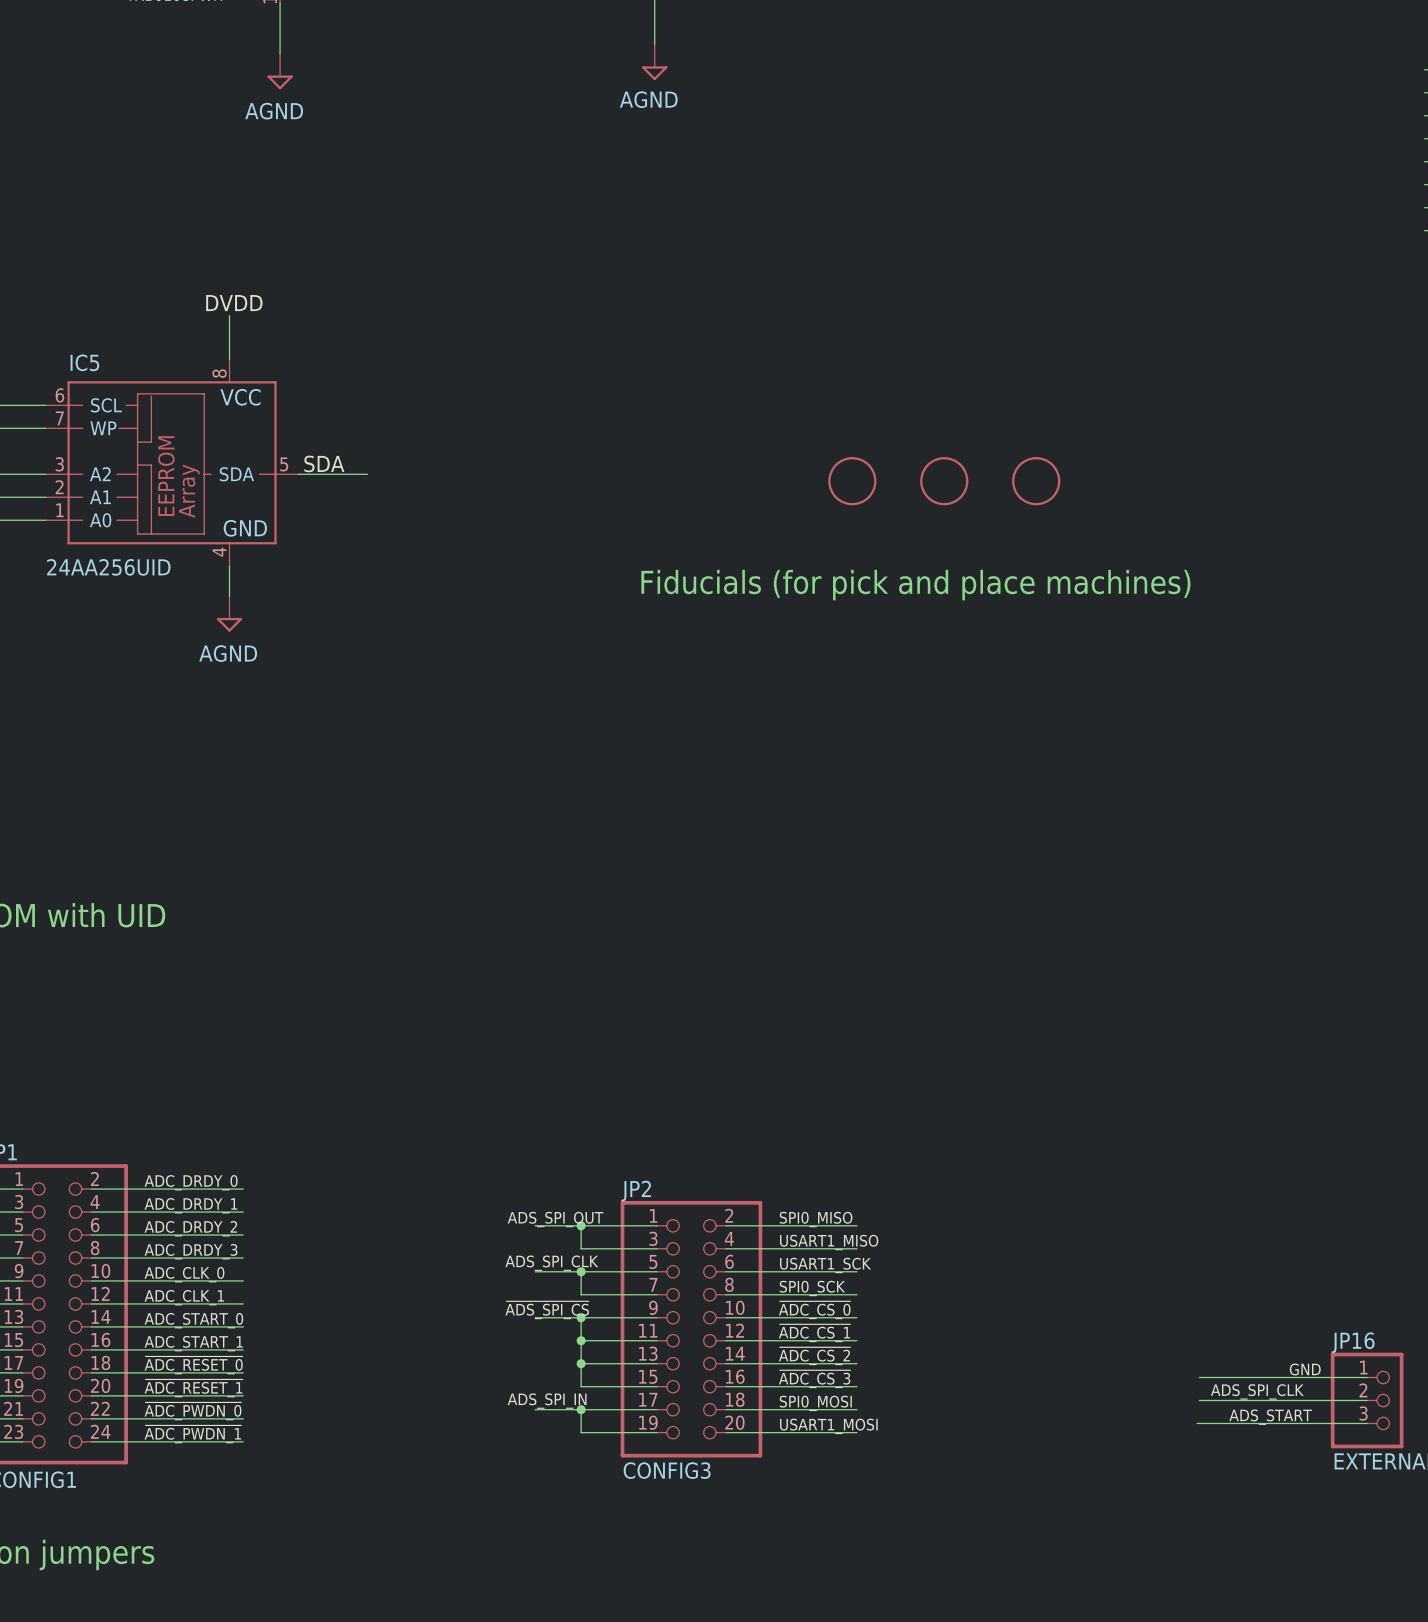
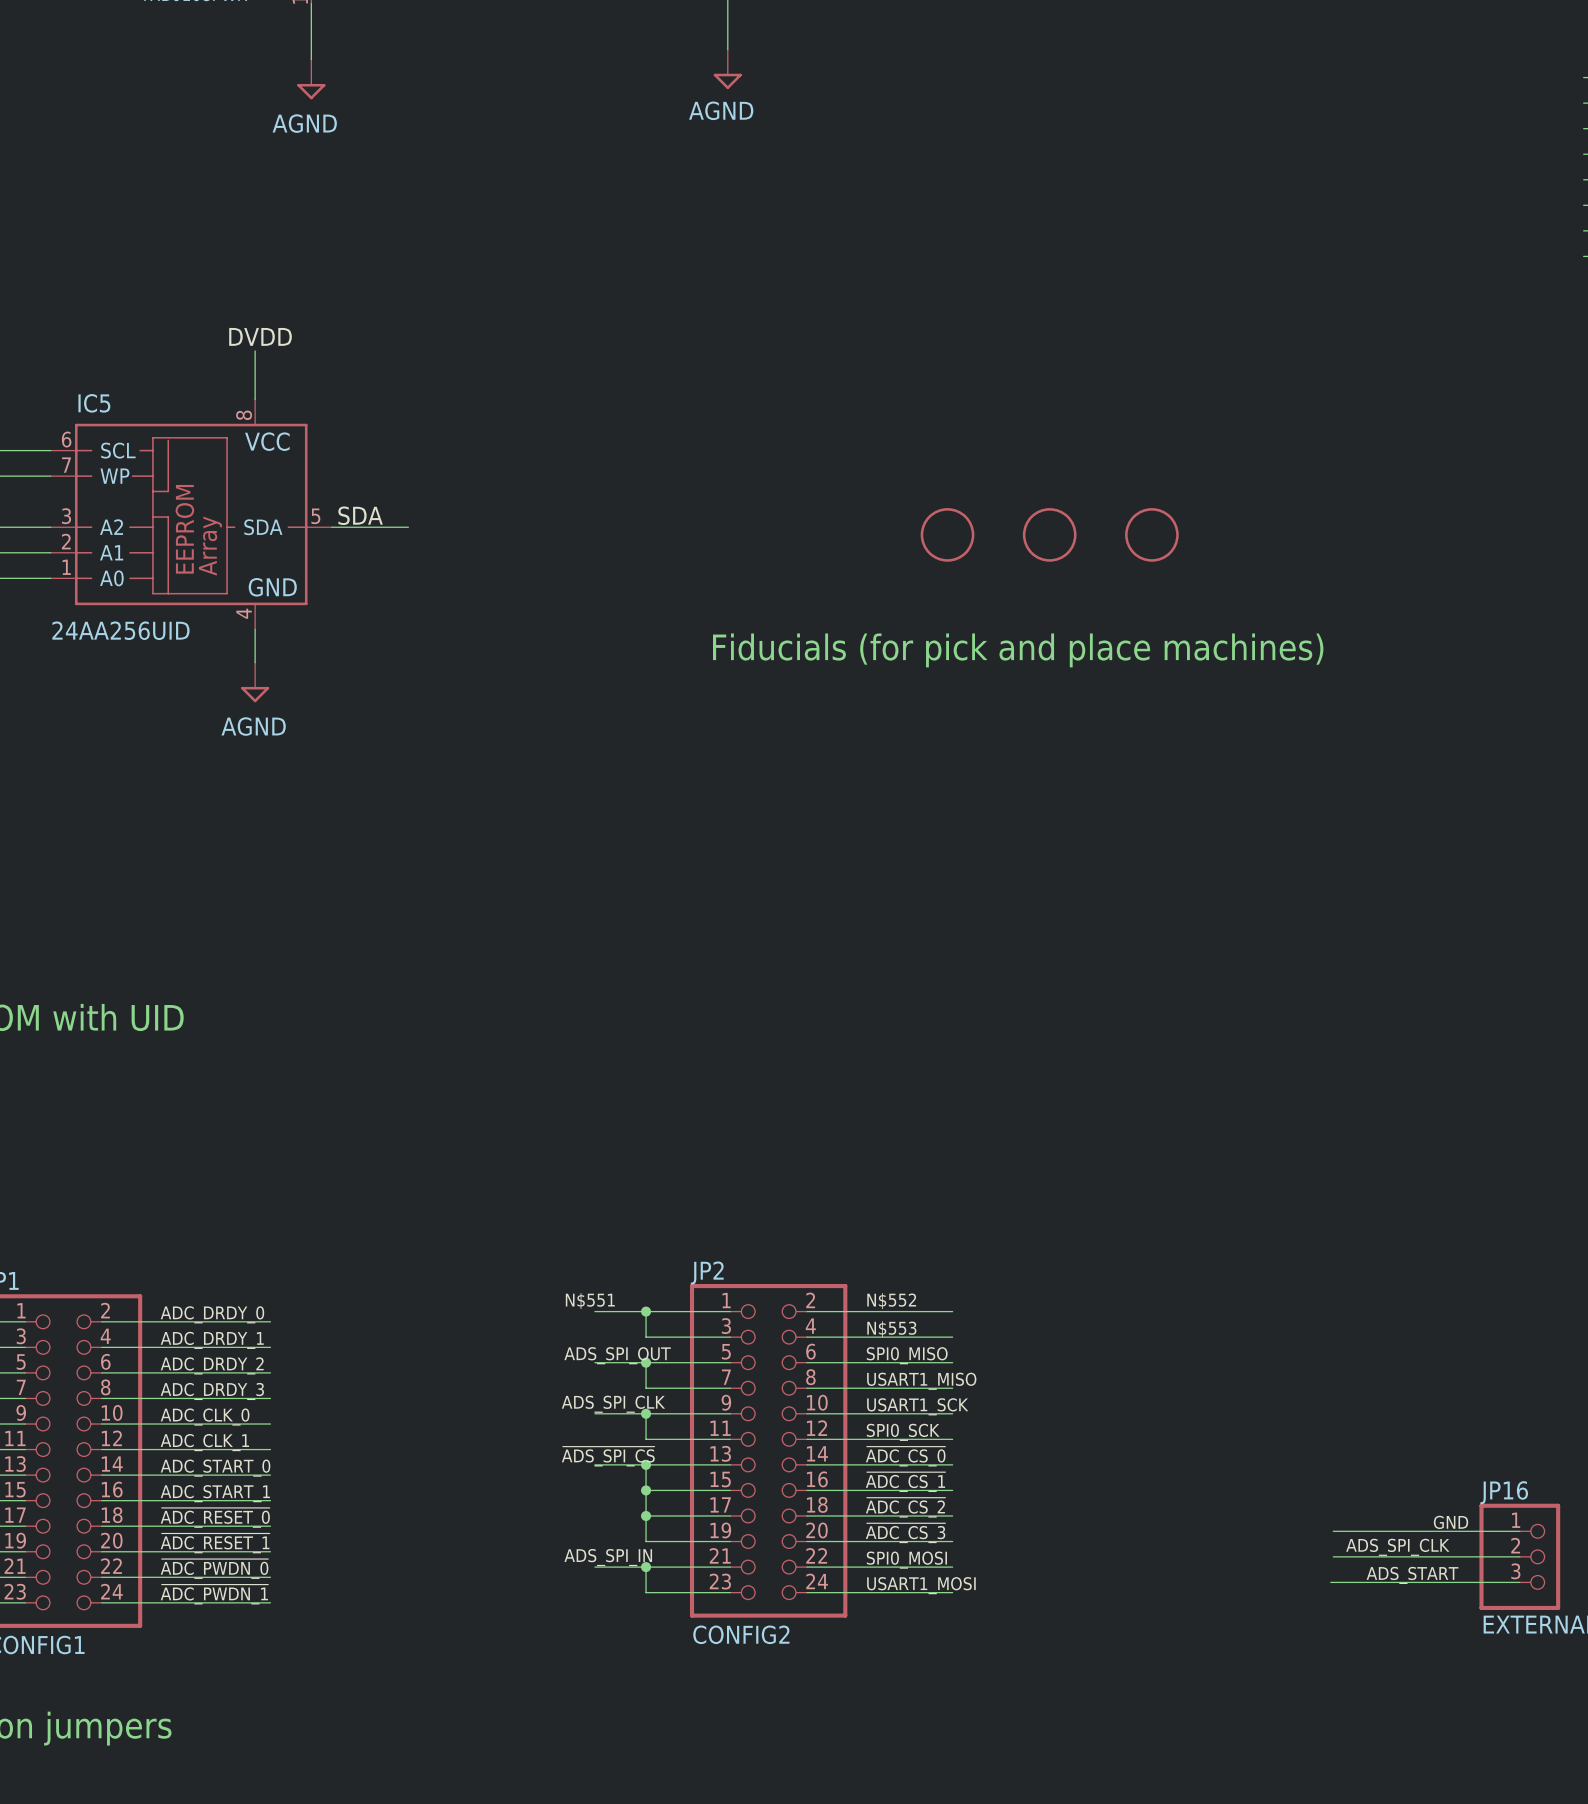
label: none -> N$551 (590, 1301)
label: none -> N$552 (891, 1301)
wire: none -> (594, 1311) (730, 1311)
wire: none -> (646, 1311) (646, 1337) (730, 1337)
junction: none -> (646, 1311)
wire: none -> (806, 1311) (952, 1311)
JP2 name position: JP2 (636, 1191) -> JP2 (707, 1273)
label: none -> N$553 (891, 1329)
JP2 symbol: [620, 1200, 763, 1458] -> [689, 1284, 848, 1618]
wire: none -> (806, 1337) (952, 1337)
JP2 value: CONFIG3 (667, 1470) -> CONFIG2 (741, 1634)

